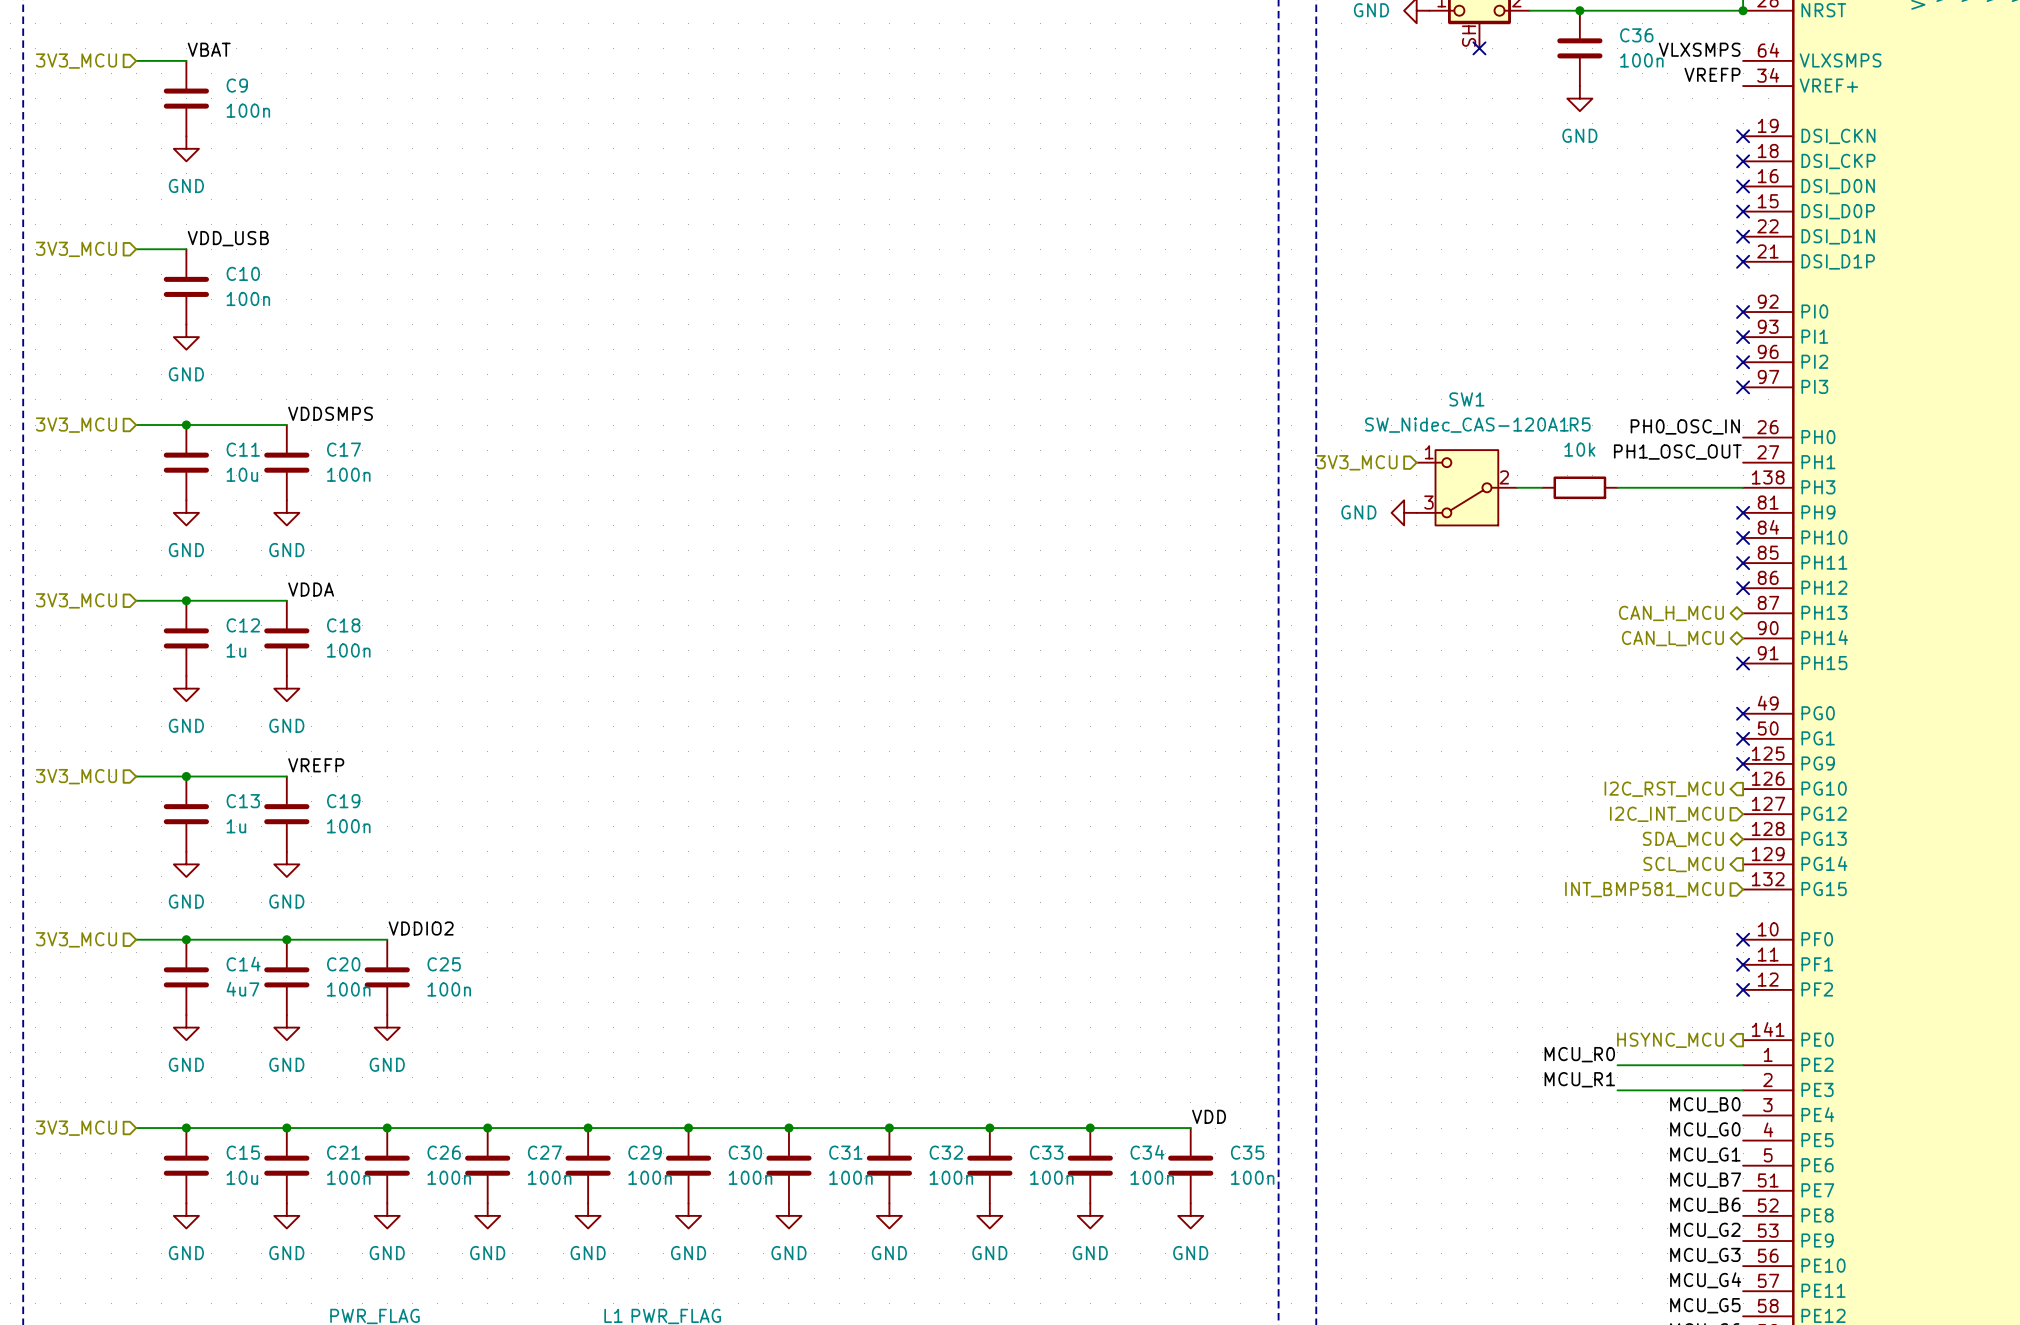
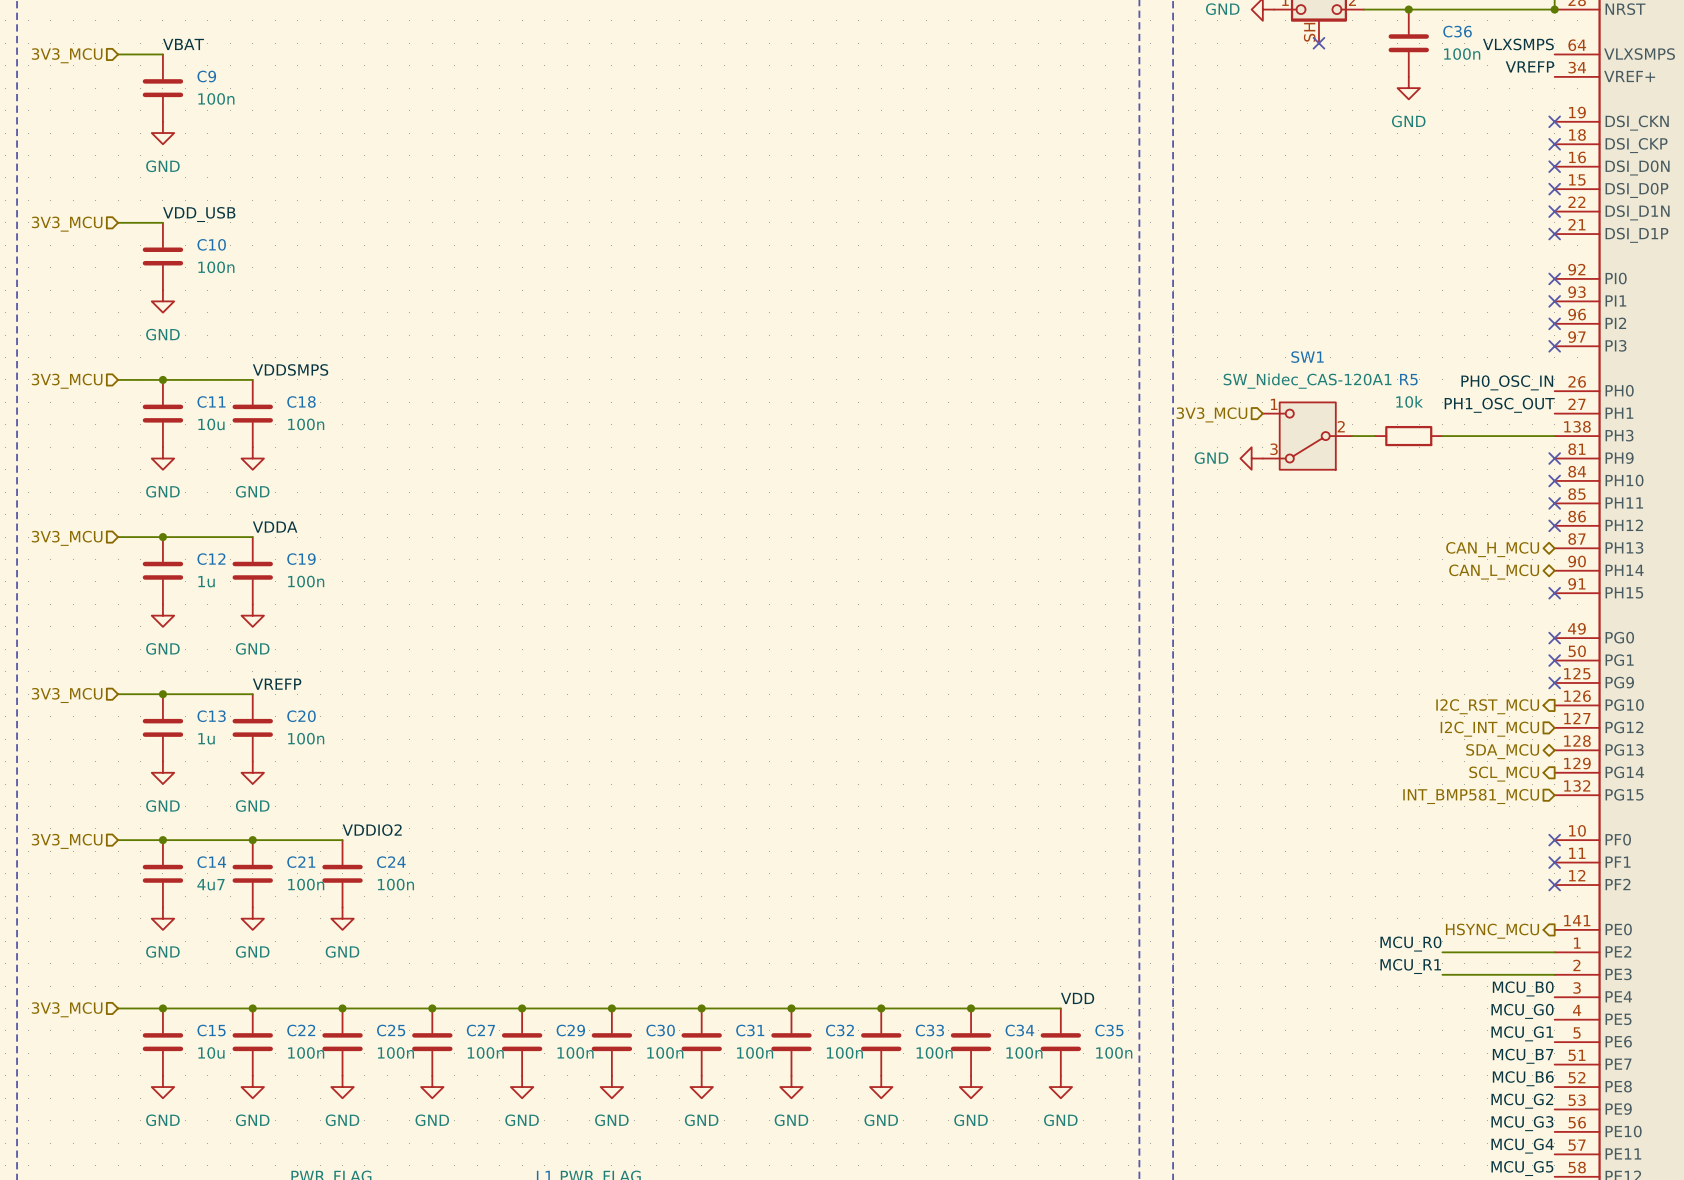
C17 name: C17 (344, 449) -> C18 (301, 401)
C18 name: C18 (343, 625) -> C19 (301, 559)
C19 name: C19 (343, 801) -> C20 (301, 716)
C20 name: C20 (343, 964) -> C21 (301, 862)
C25 name: C25 (444, 964) -> C24 (391, 862)
C21 name: C21 (343, 1152) -> C22 (301, 1030)
C26 name: C26 (444, 1152) -> C25 (391, 1030)

